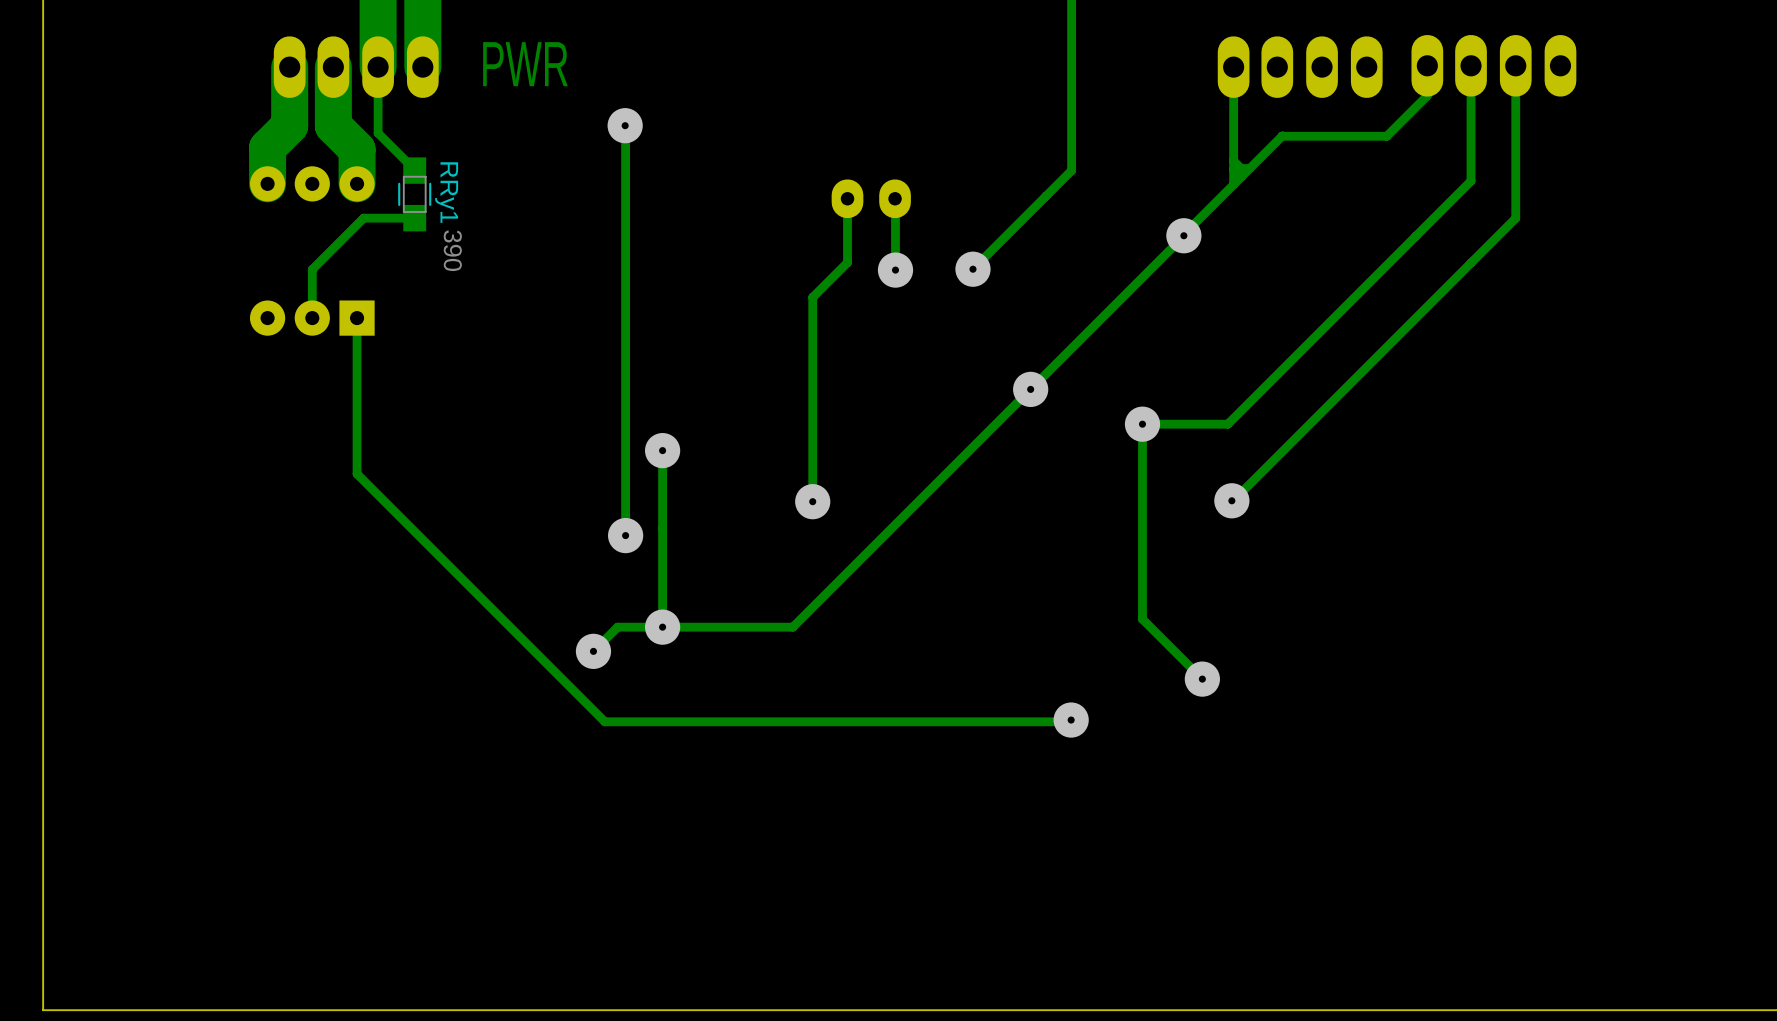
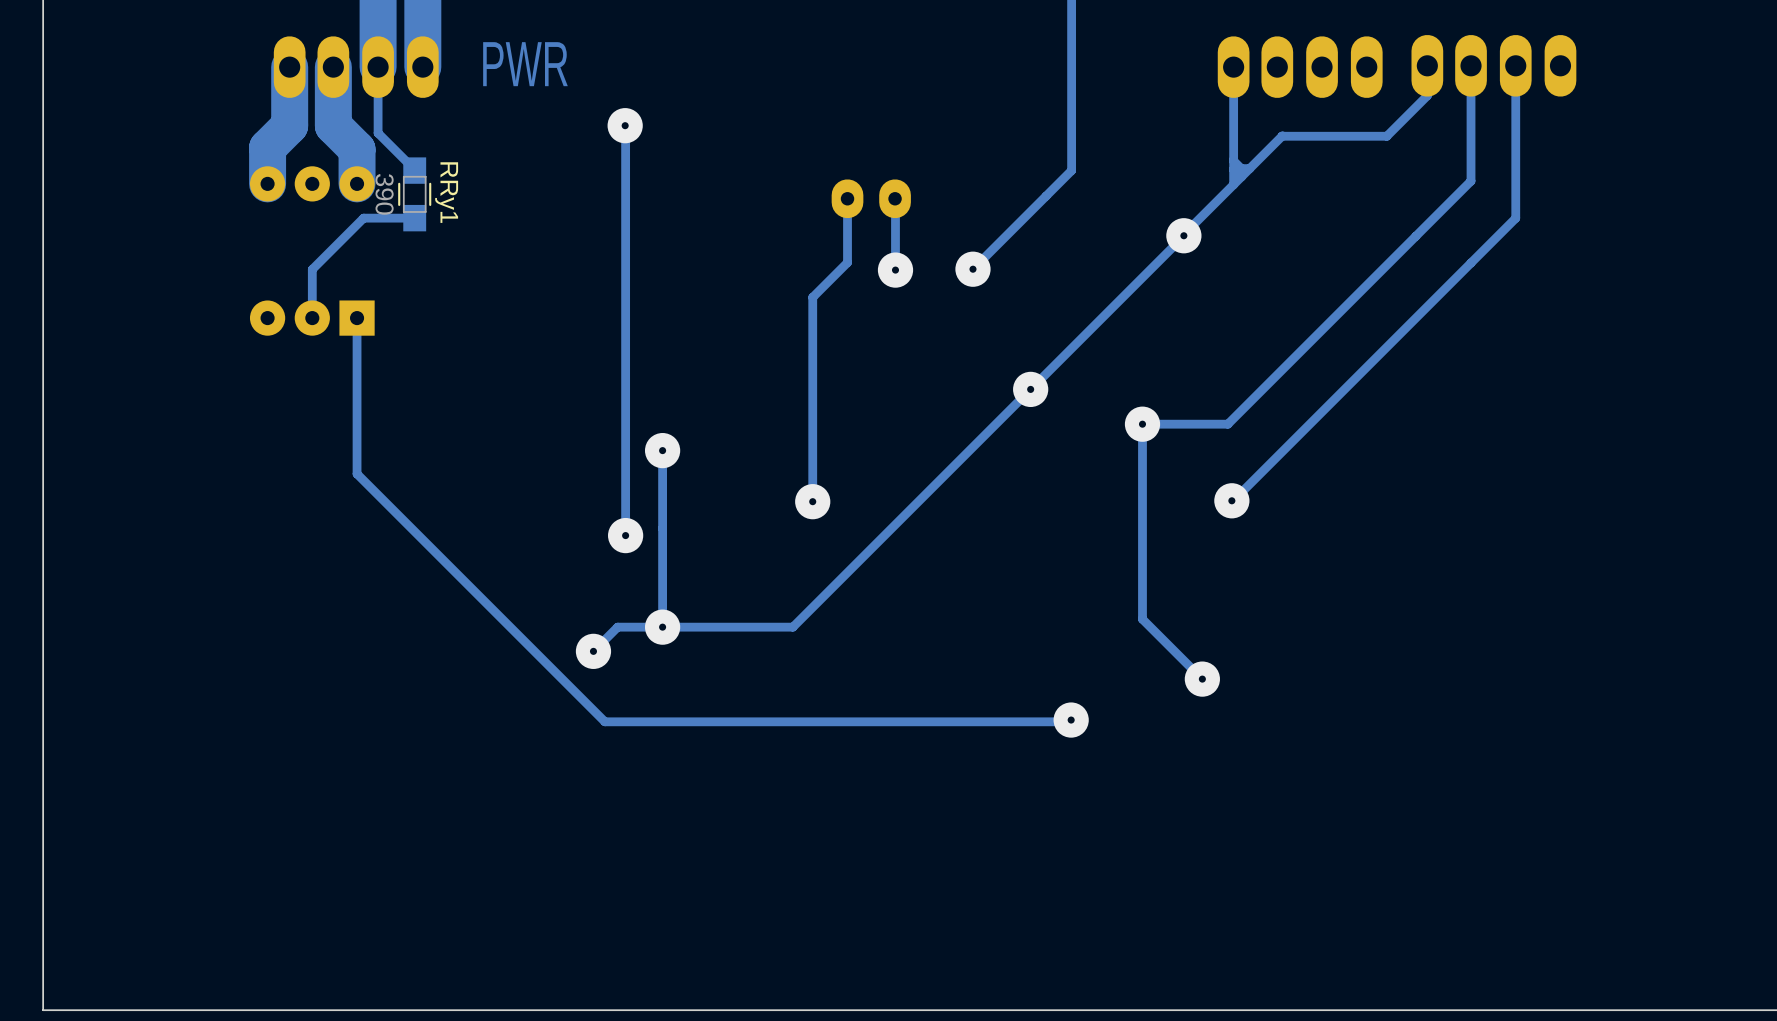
RRy1 value position: 390 (452, 250) -> 390 (384, 194)

